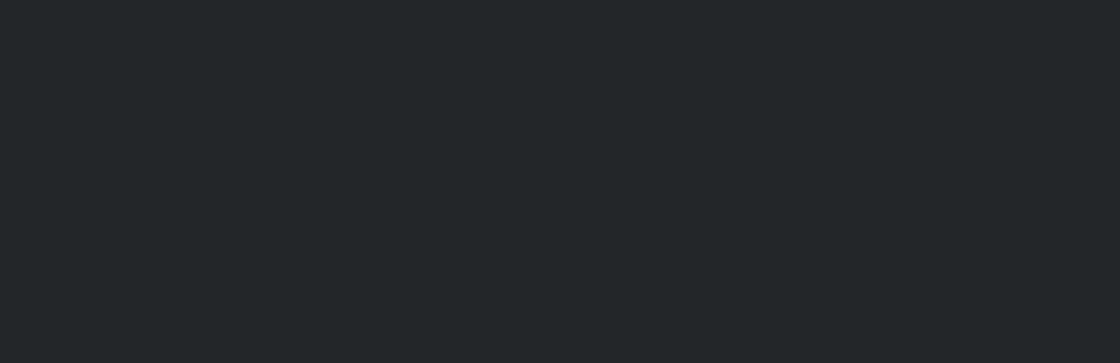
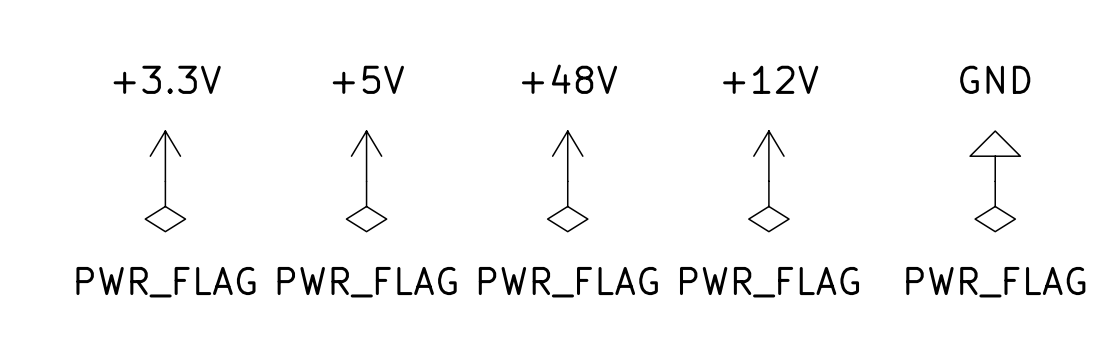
power symbol: none -> +3.3V (165, 156)
power symbol: none -> +5V (366, 156)
power symbol: none -> +48V (567, 156)
power symbol: none -> +12V (768, 156)
power symbol: none -> GND (995, 156)
power symbol: none -> PWR_FLAG (165, 206)
power symbol: none -> PWR_FLAG (366, 206)
power symbol: none -> PWR_FLAG (567, 206)
power symbol: none -> PWR_FLAG (768, 206)
power symbol: none -> PWR_FLAG (995, 206)

